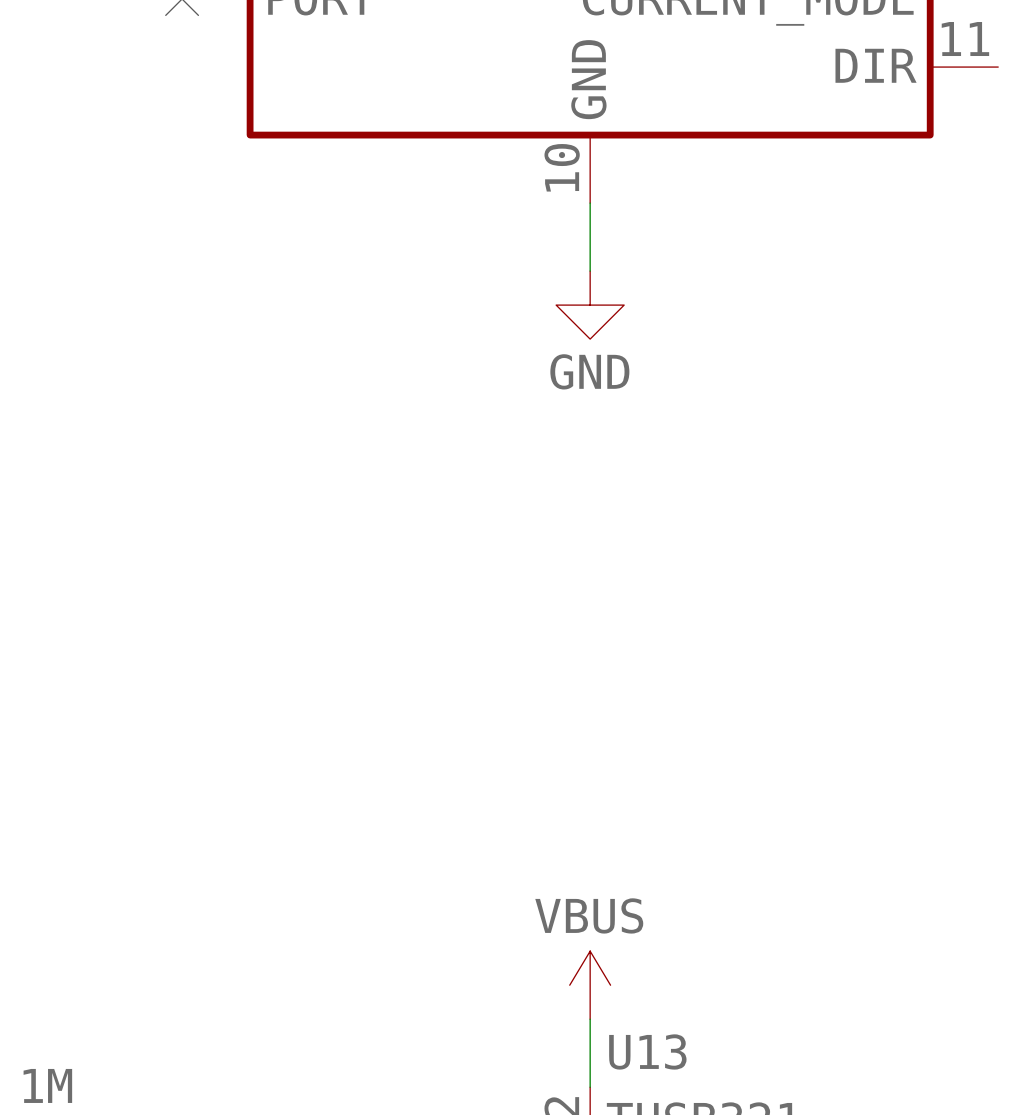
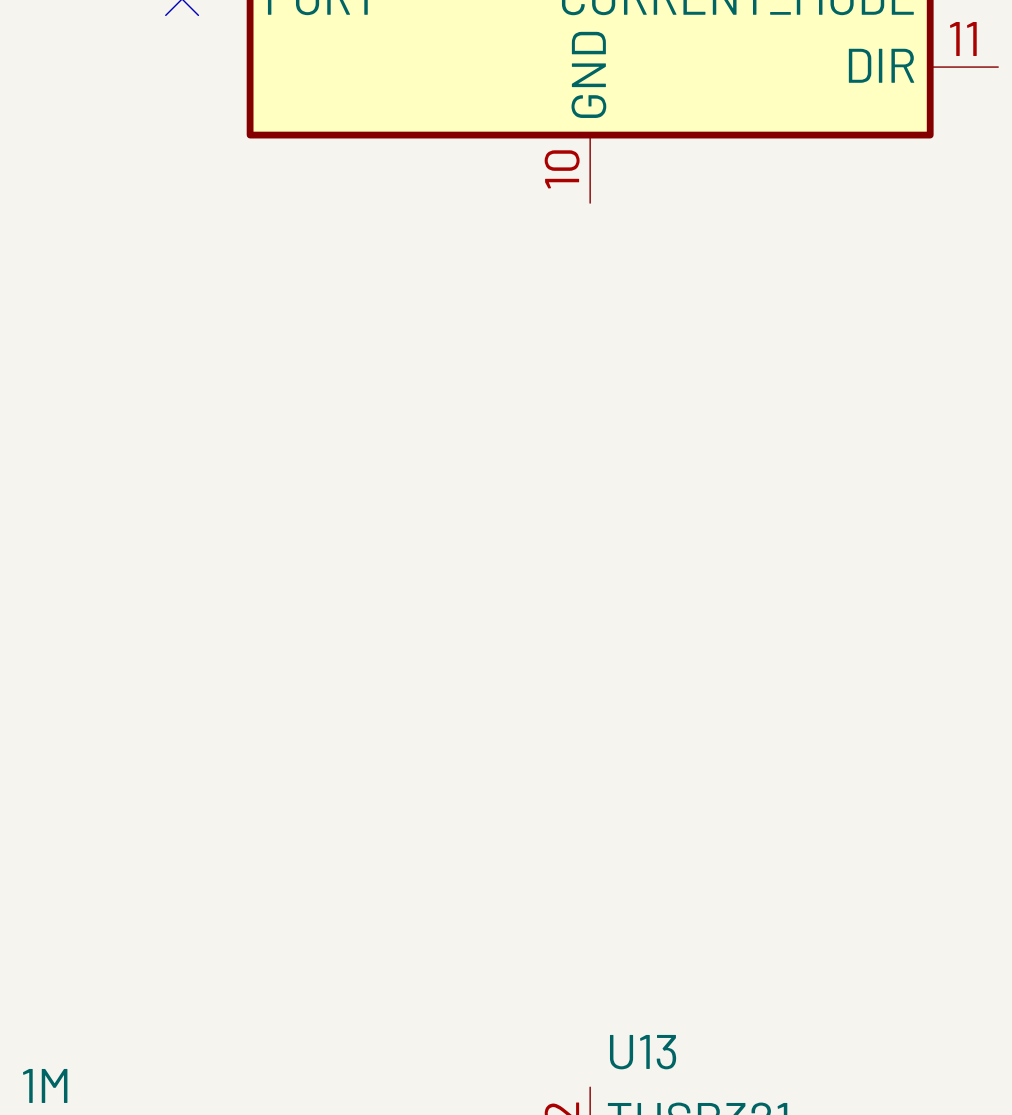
wire: (590, 203) (590, 271) -> none
power symbol: GND (590, 305) -> none
power symbol: VBUS (590, 985) -> none
wire: (590, 1019) (590, 1087) -> none

